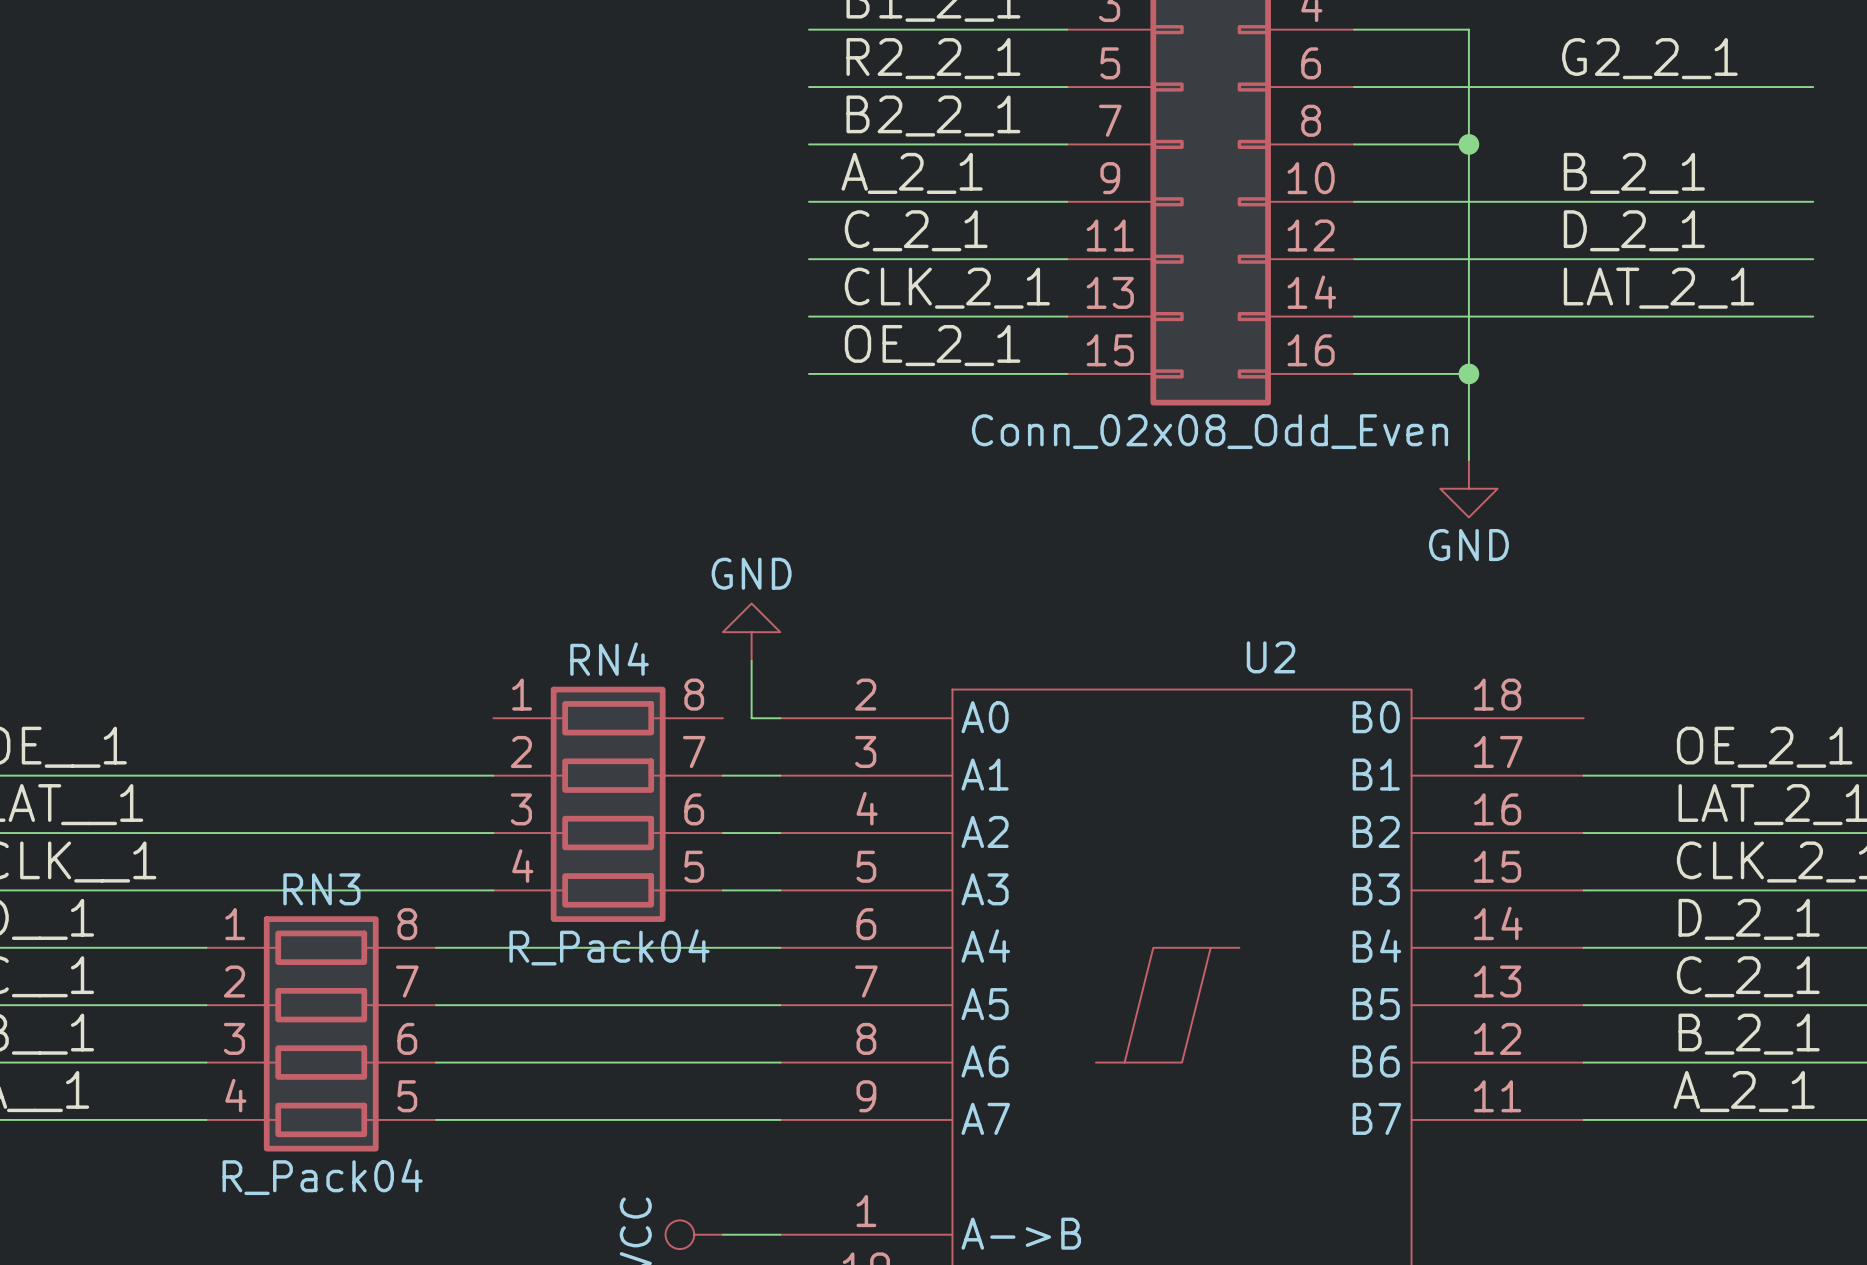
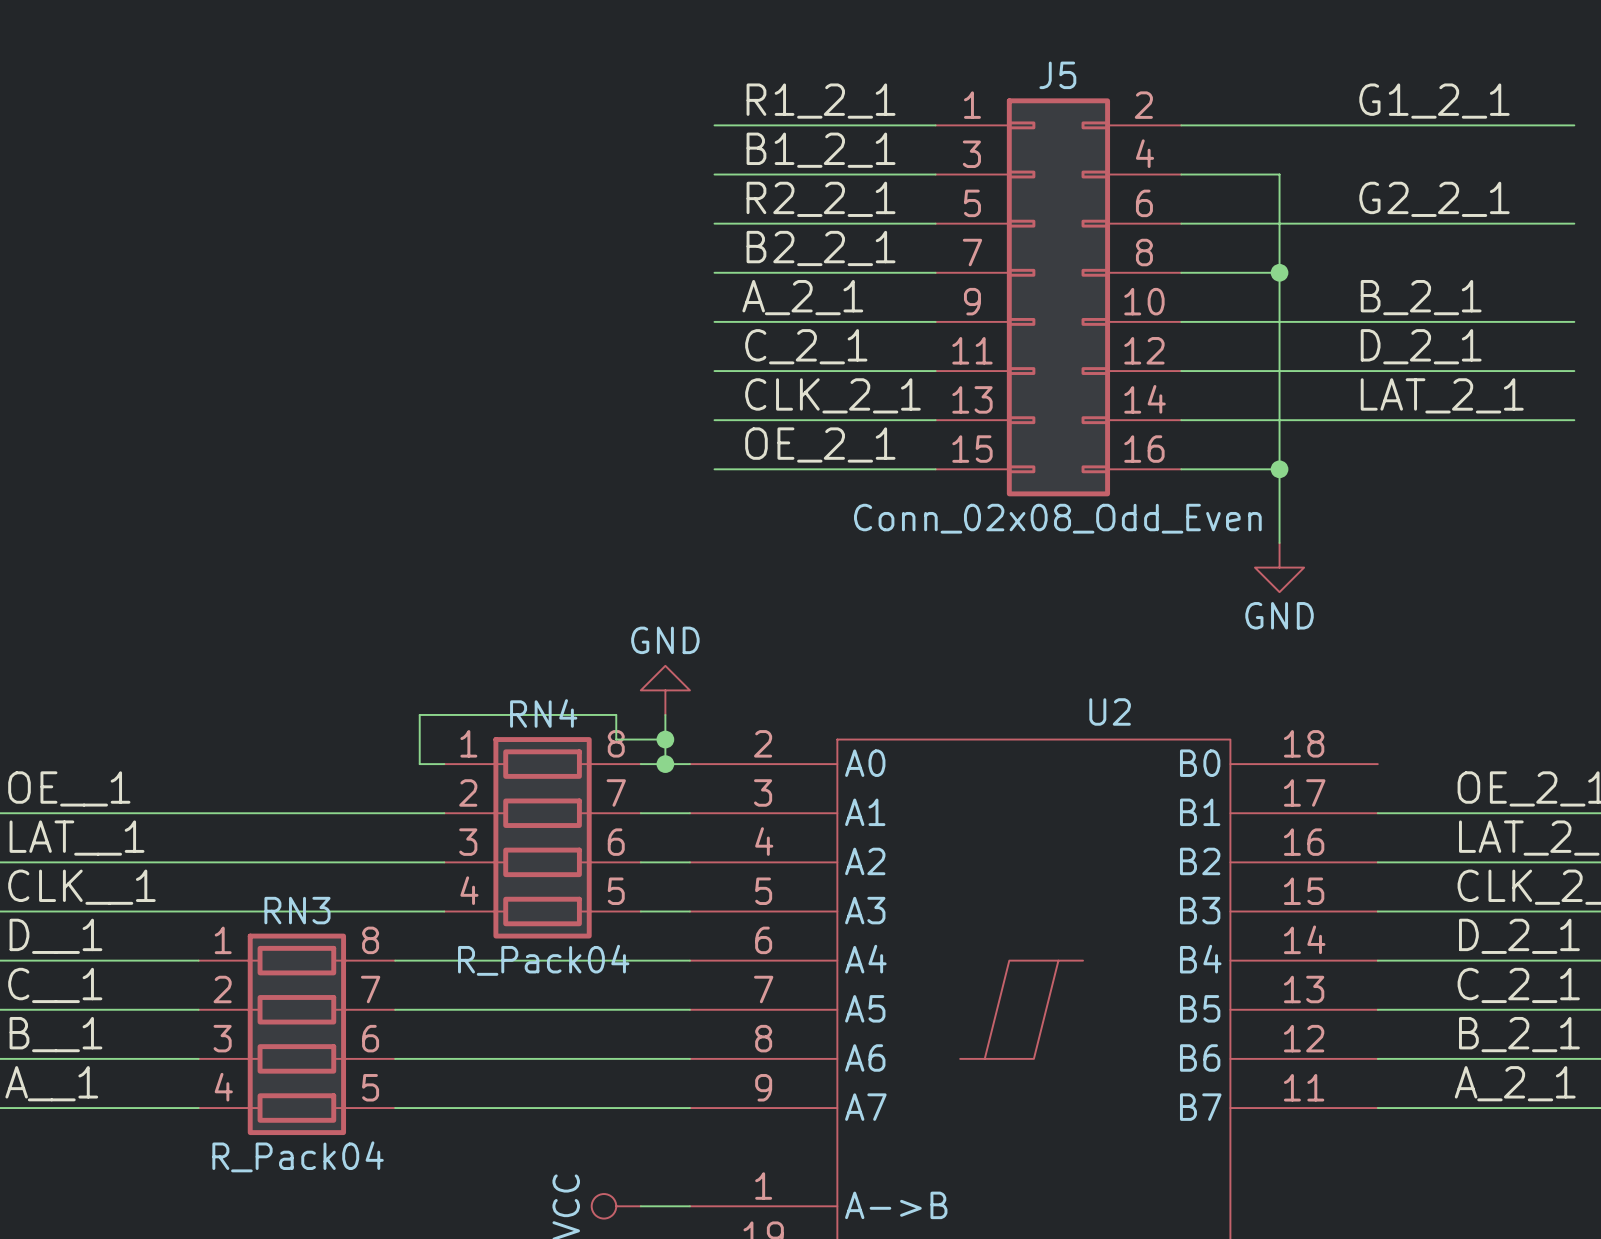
wire: none -> (665, 739) (616, 739) (616, 714) (419, 714) (419, 764) (444, 764)
junction: none -> (665, 739)
wire: none -> (640, 764) (665, 764)
junction: none -> (665, 764)

